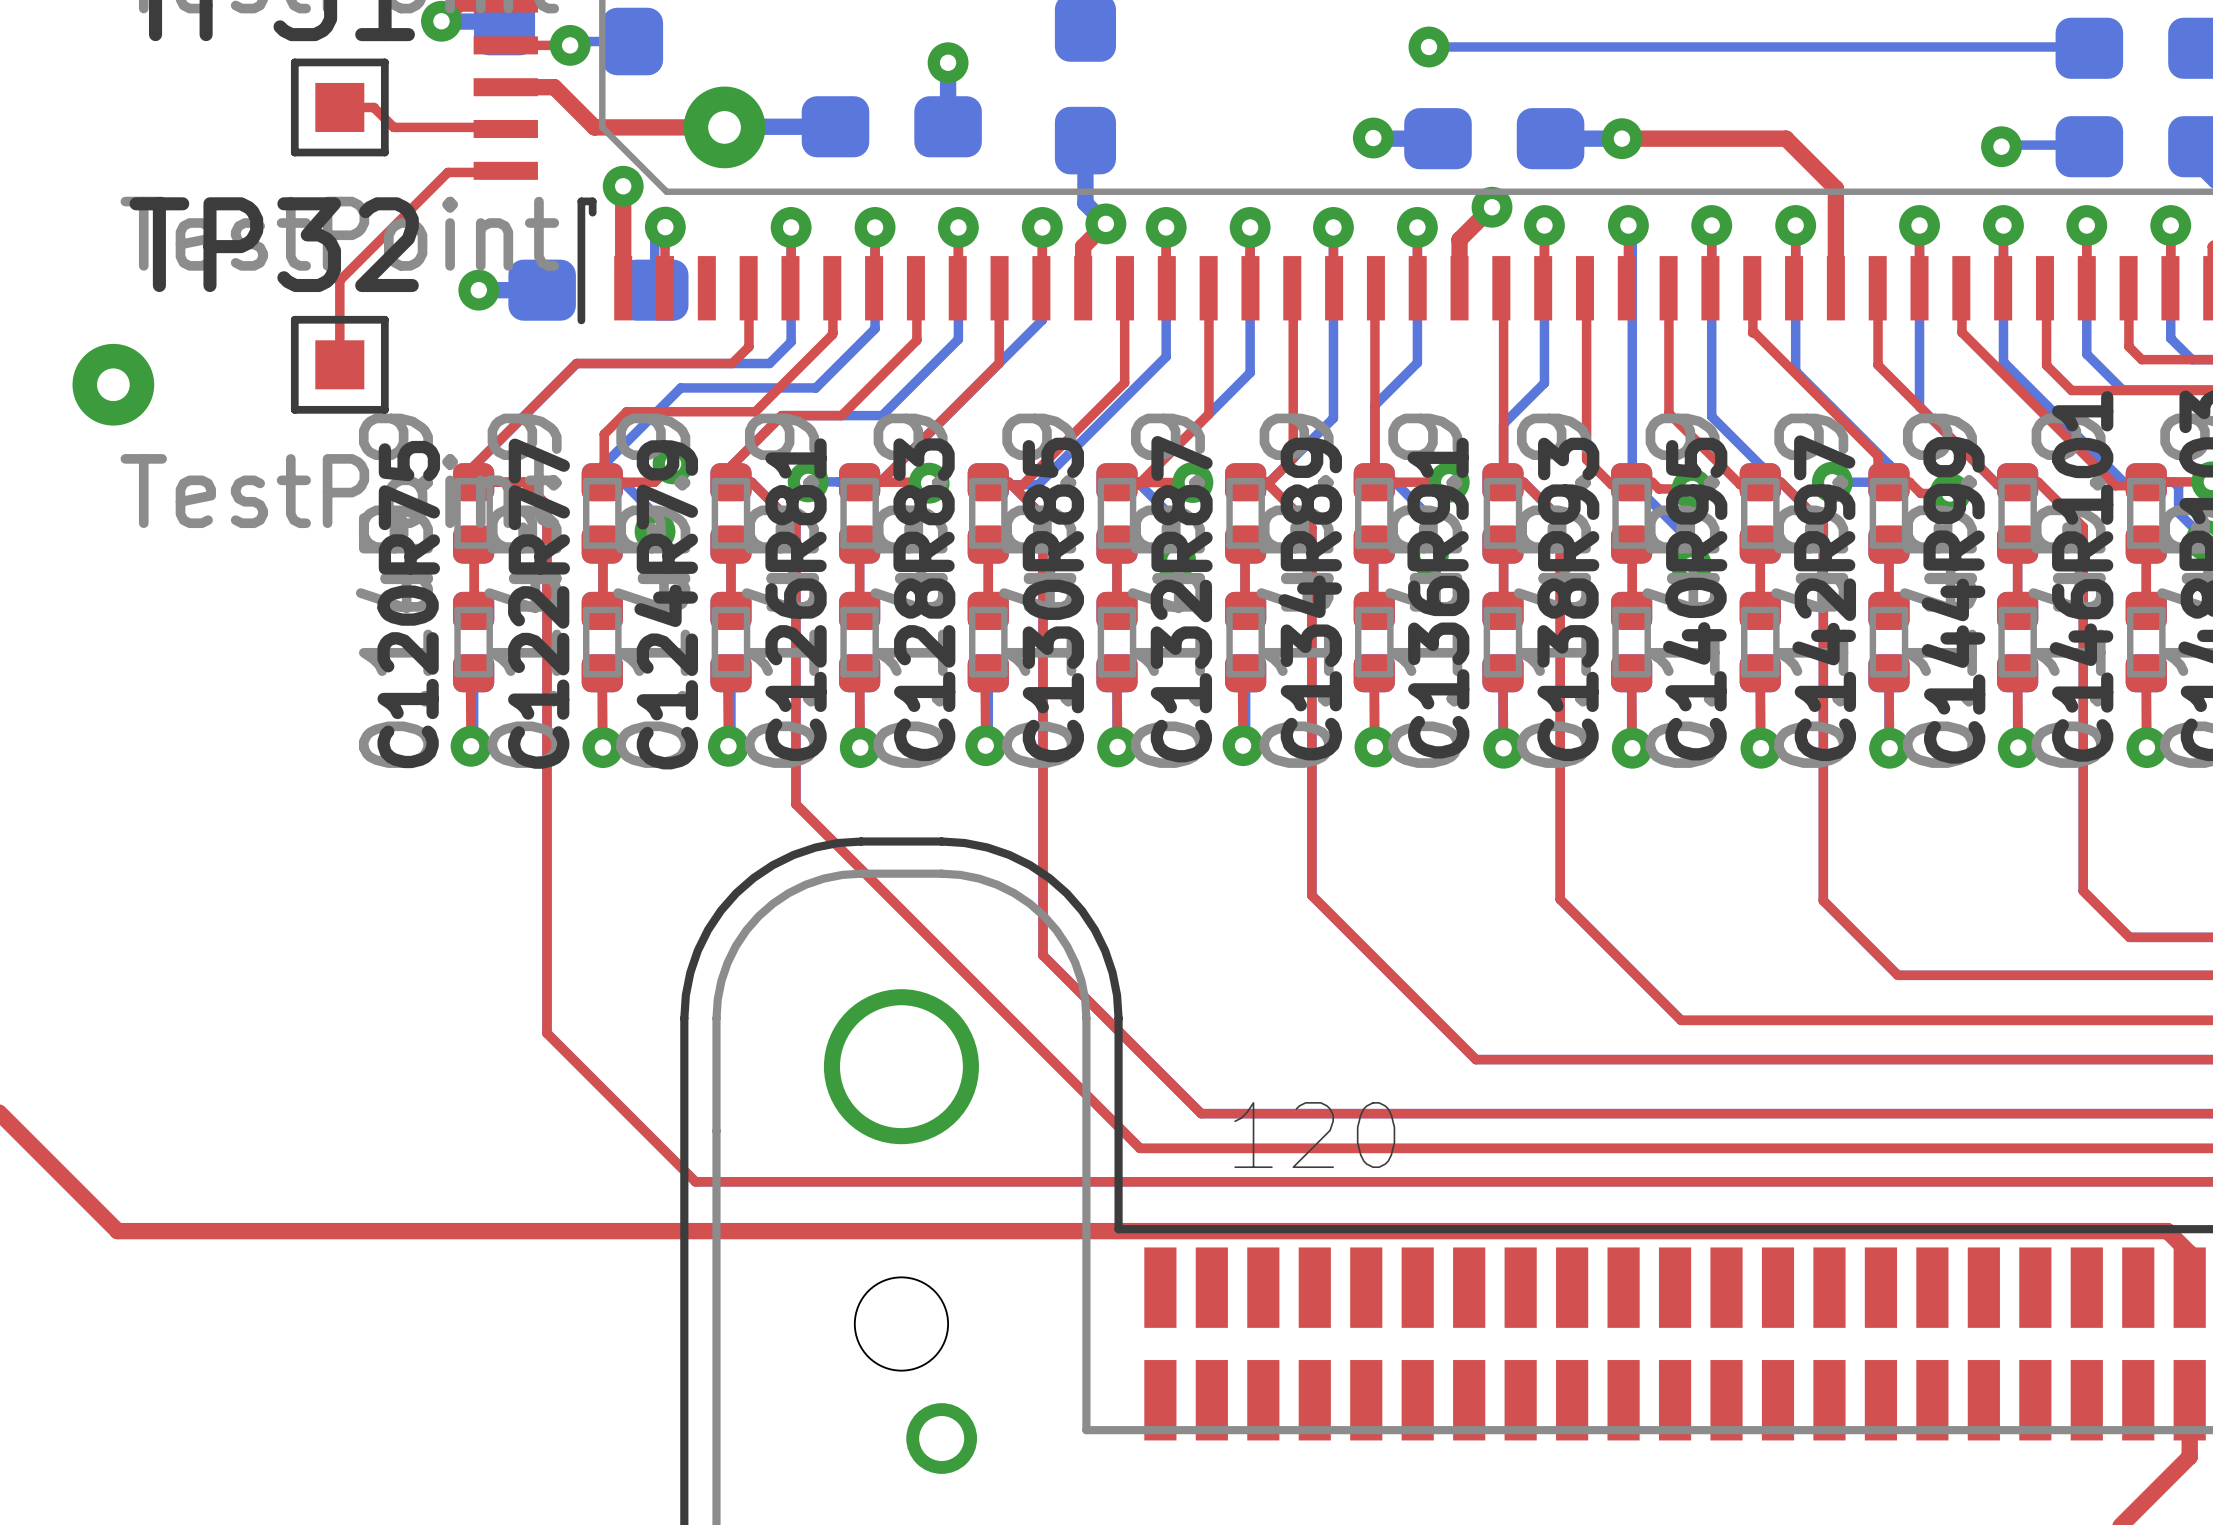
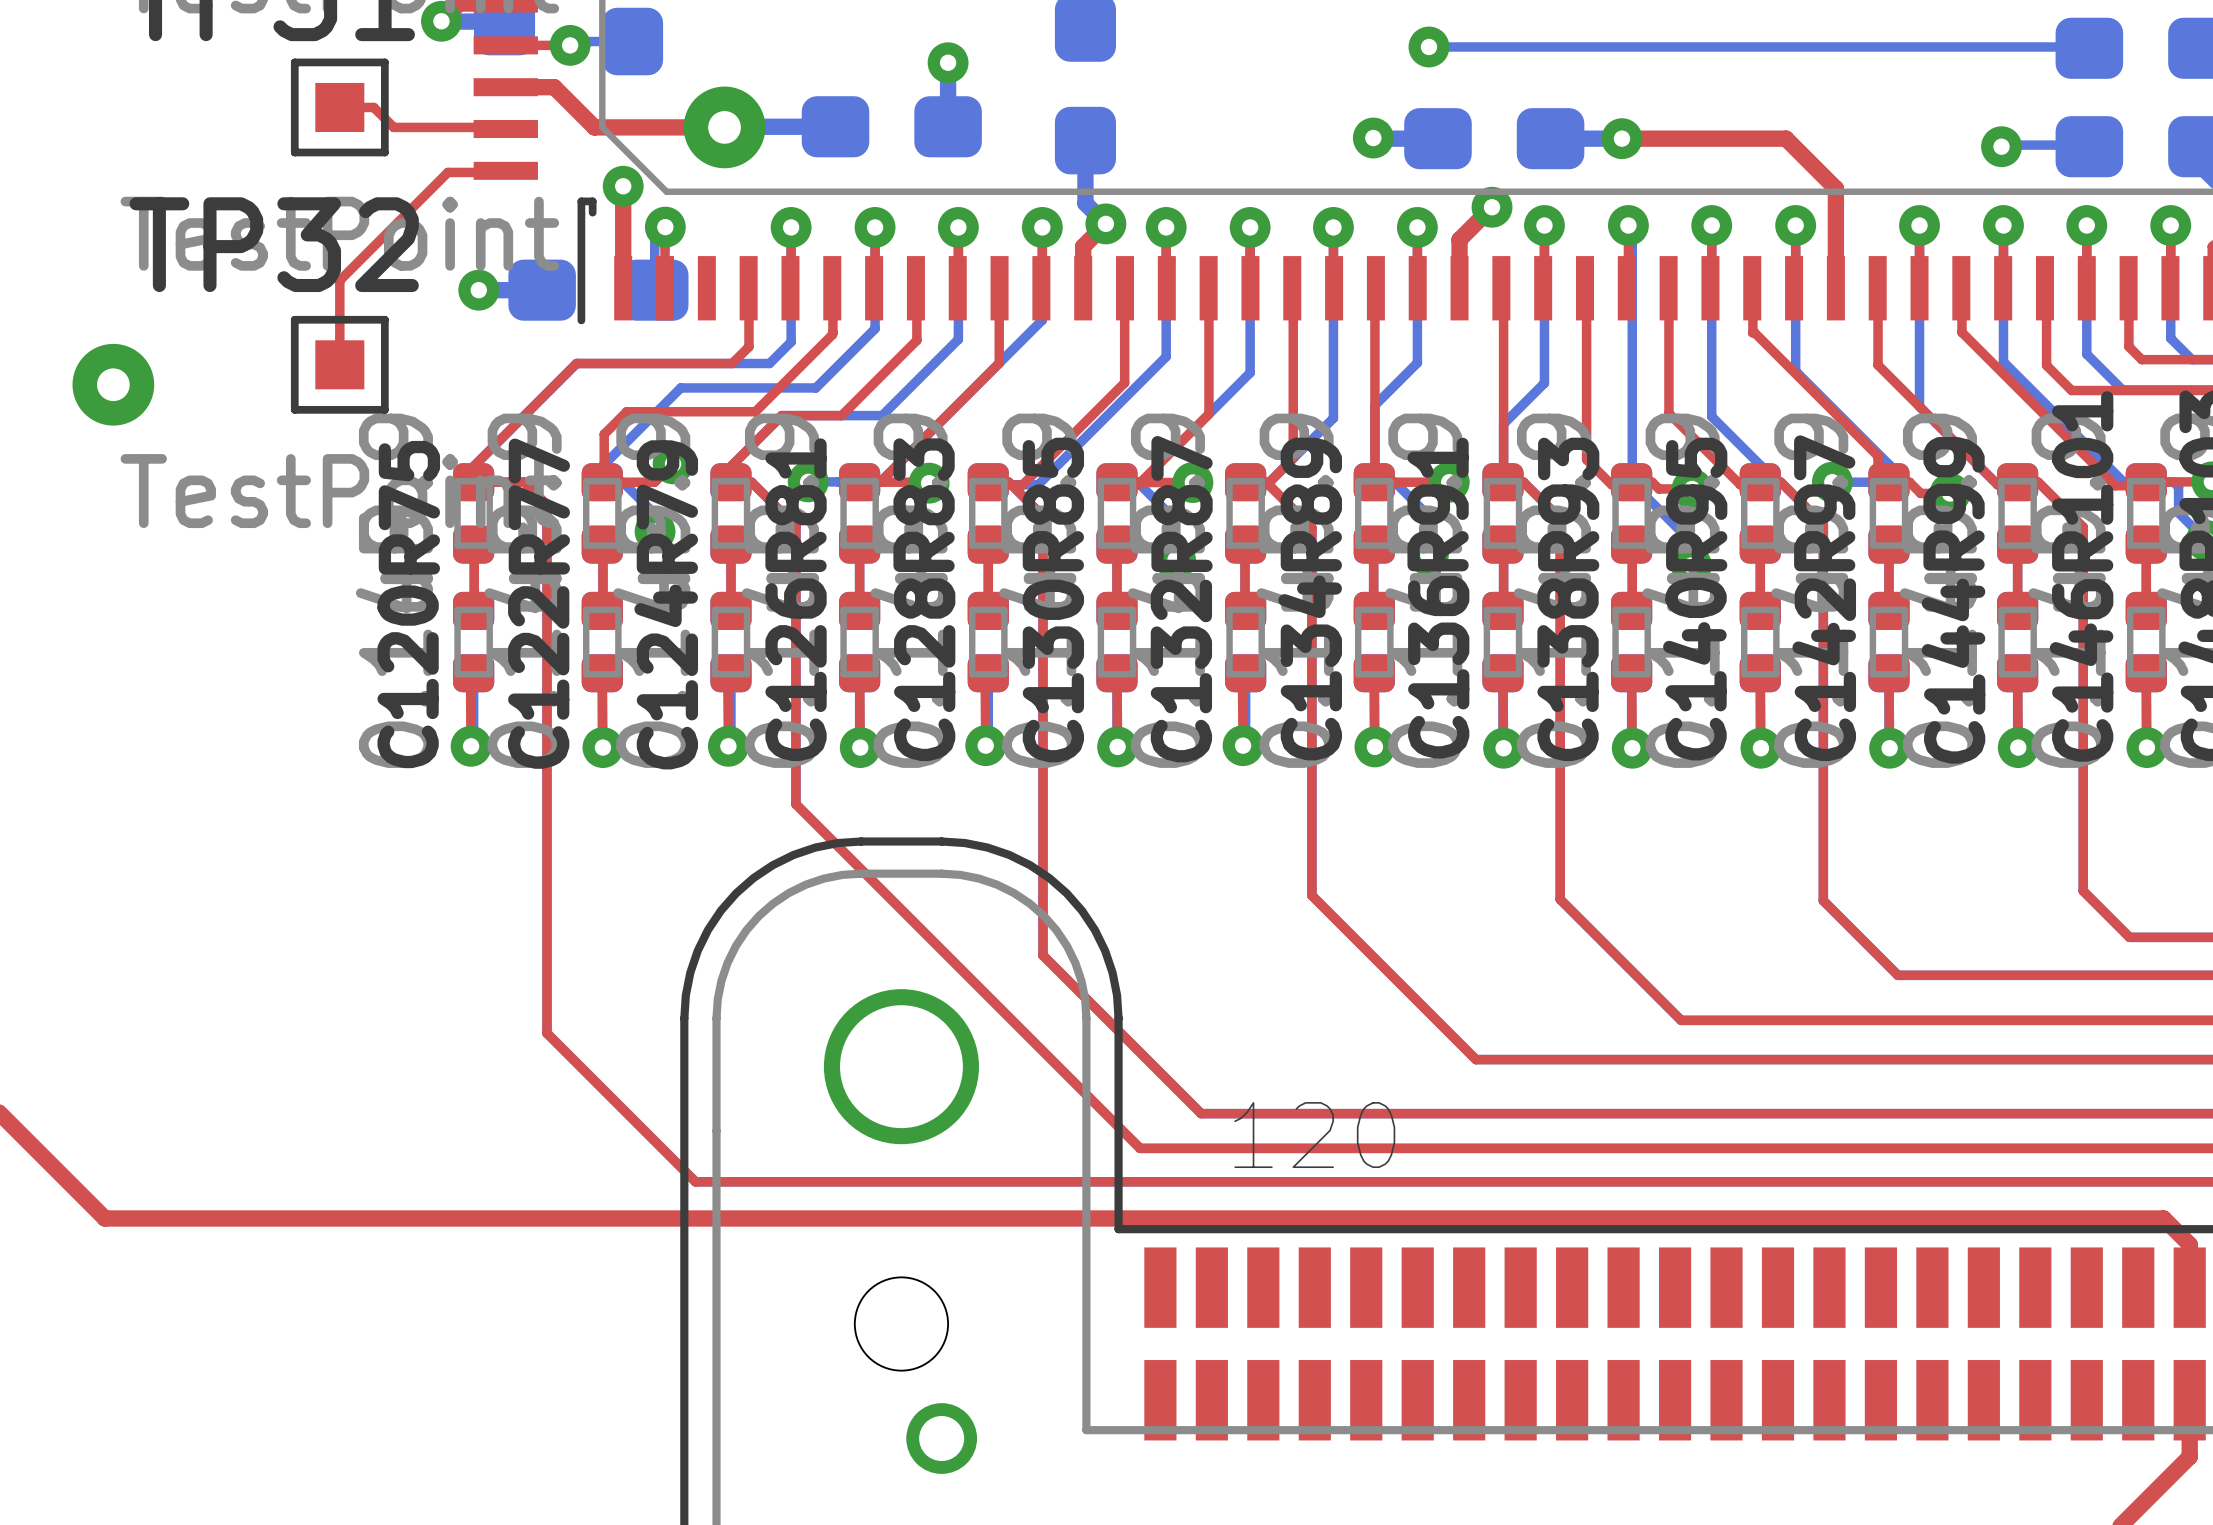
top track: (105, 1218) (117, 1231) (2167, 1231) (2189, 1253) -> (105, 1218) (2163, 1218) (2189, 1244) (2189, 1253)

